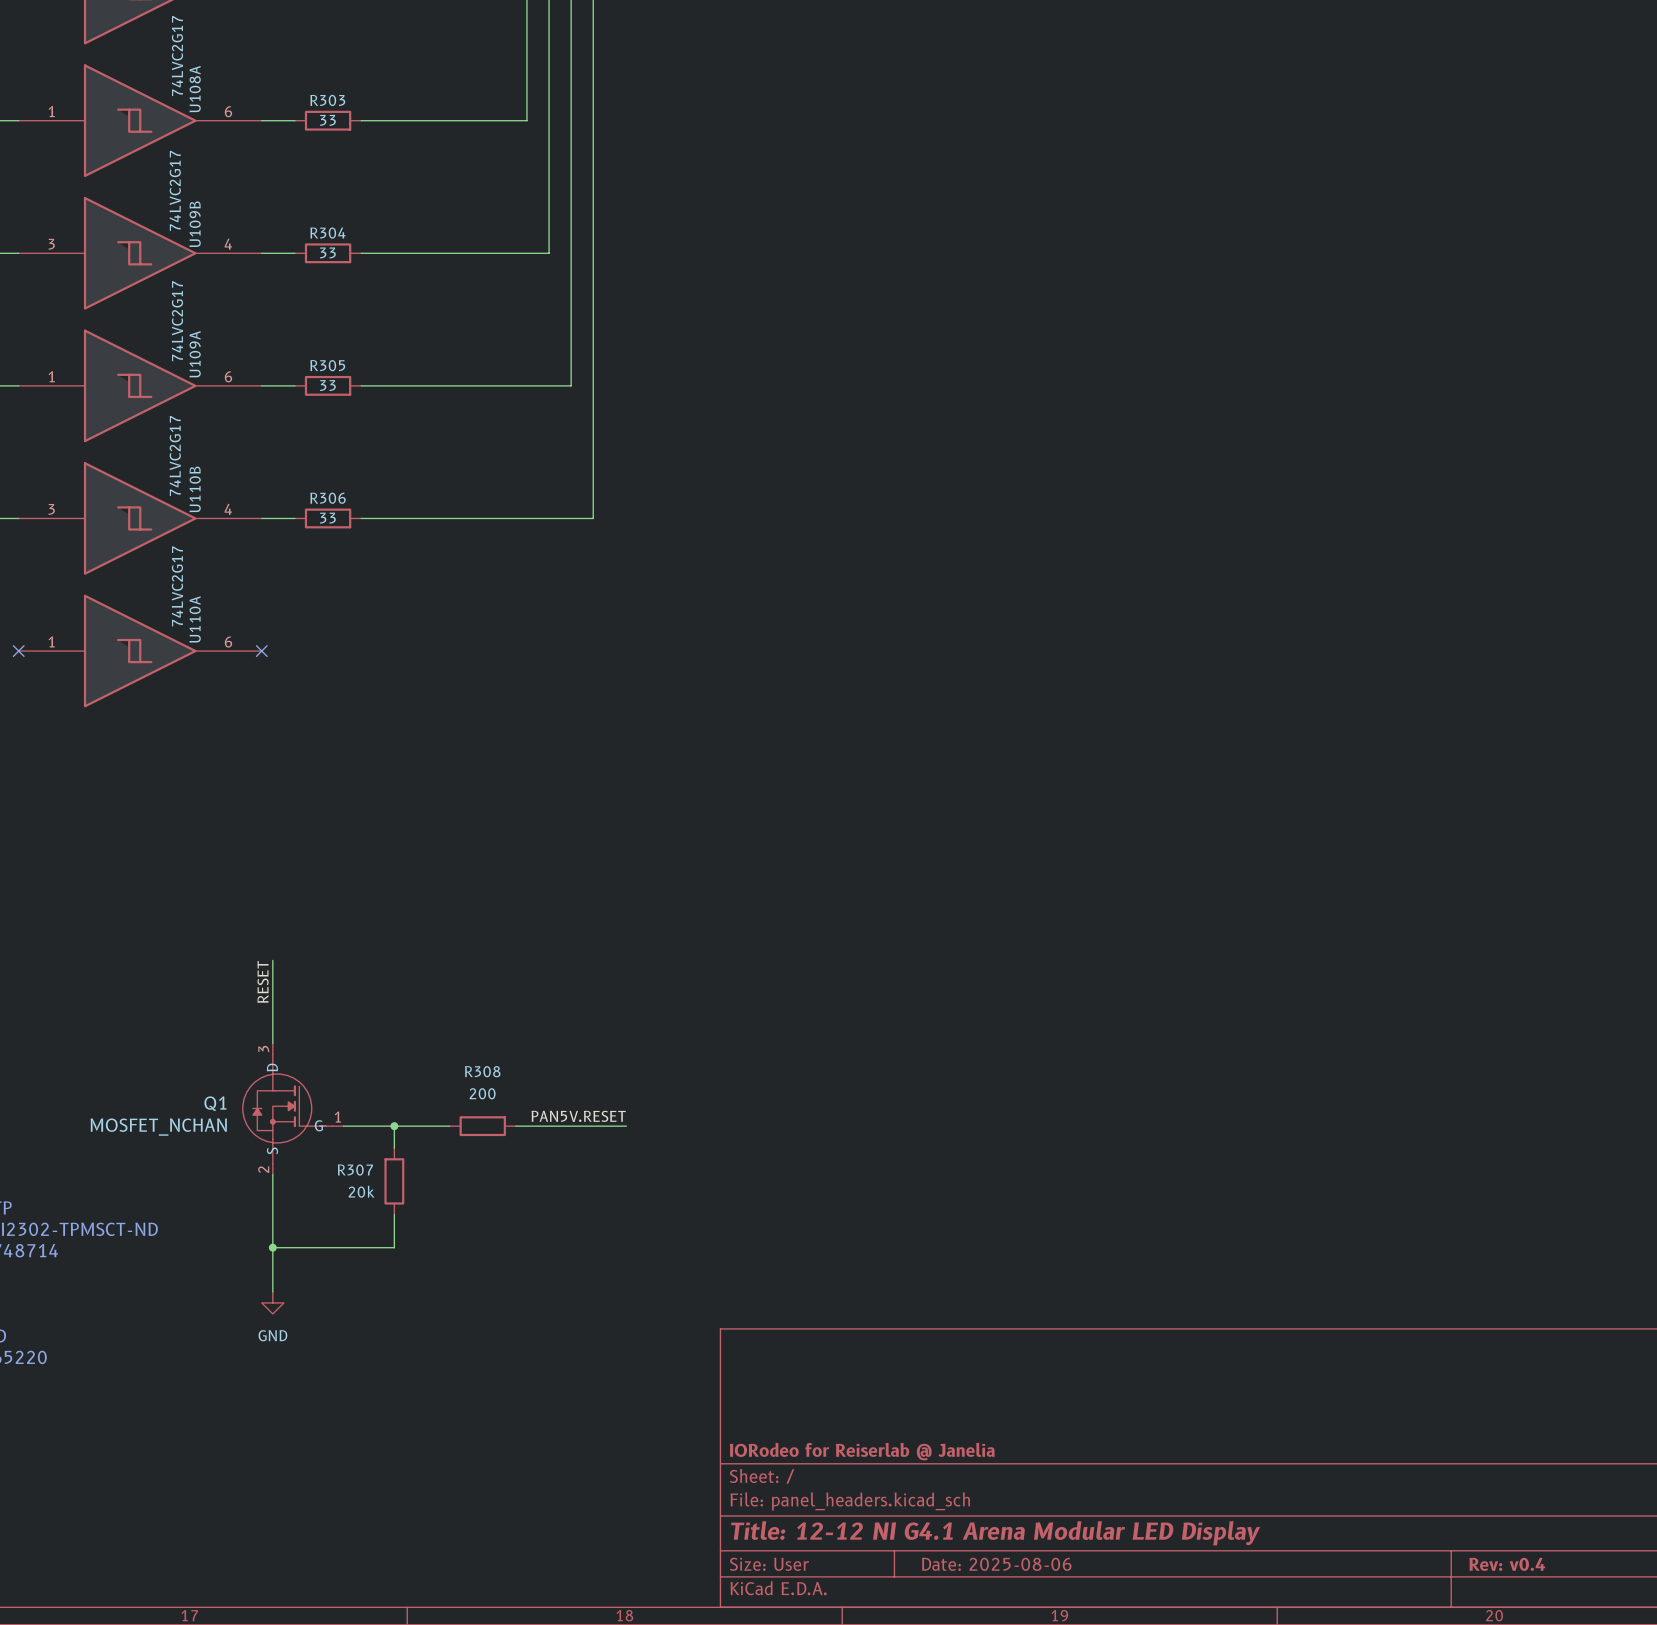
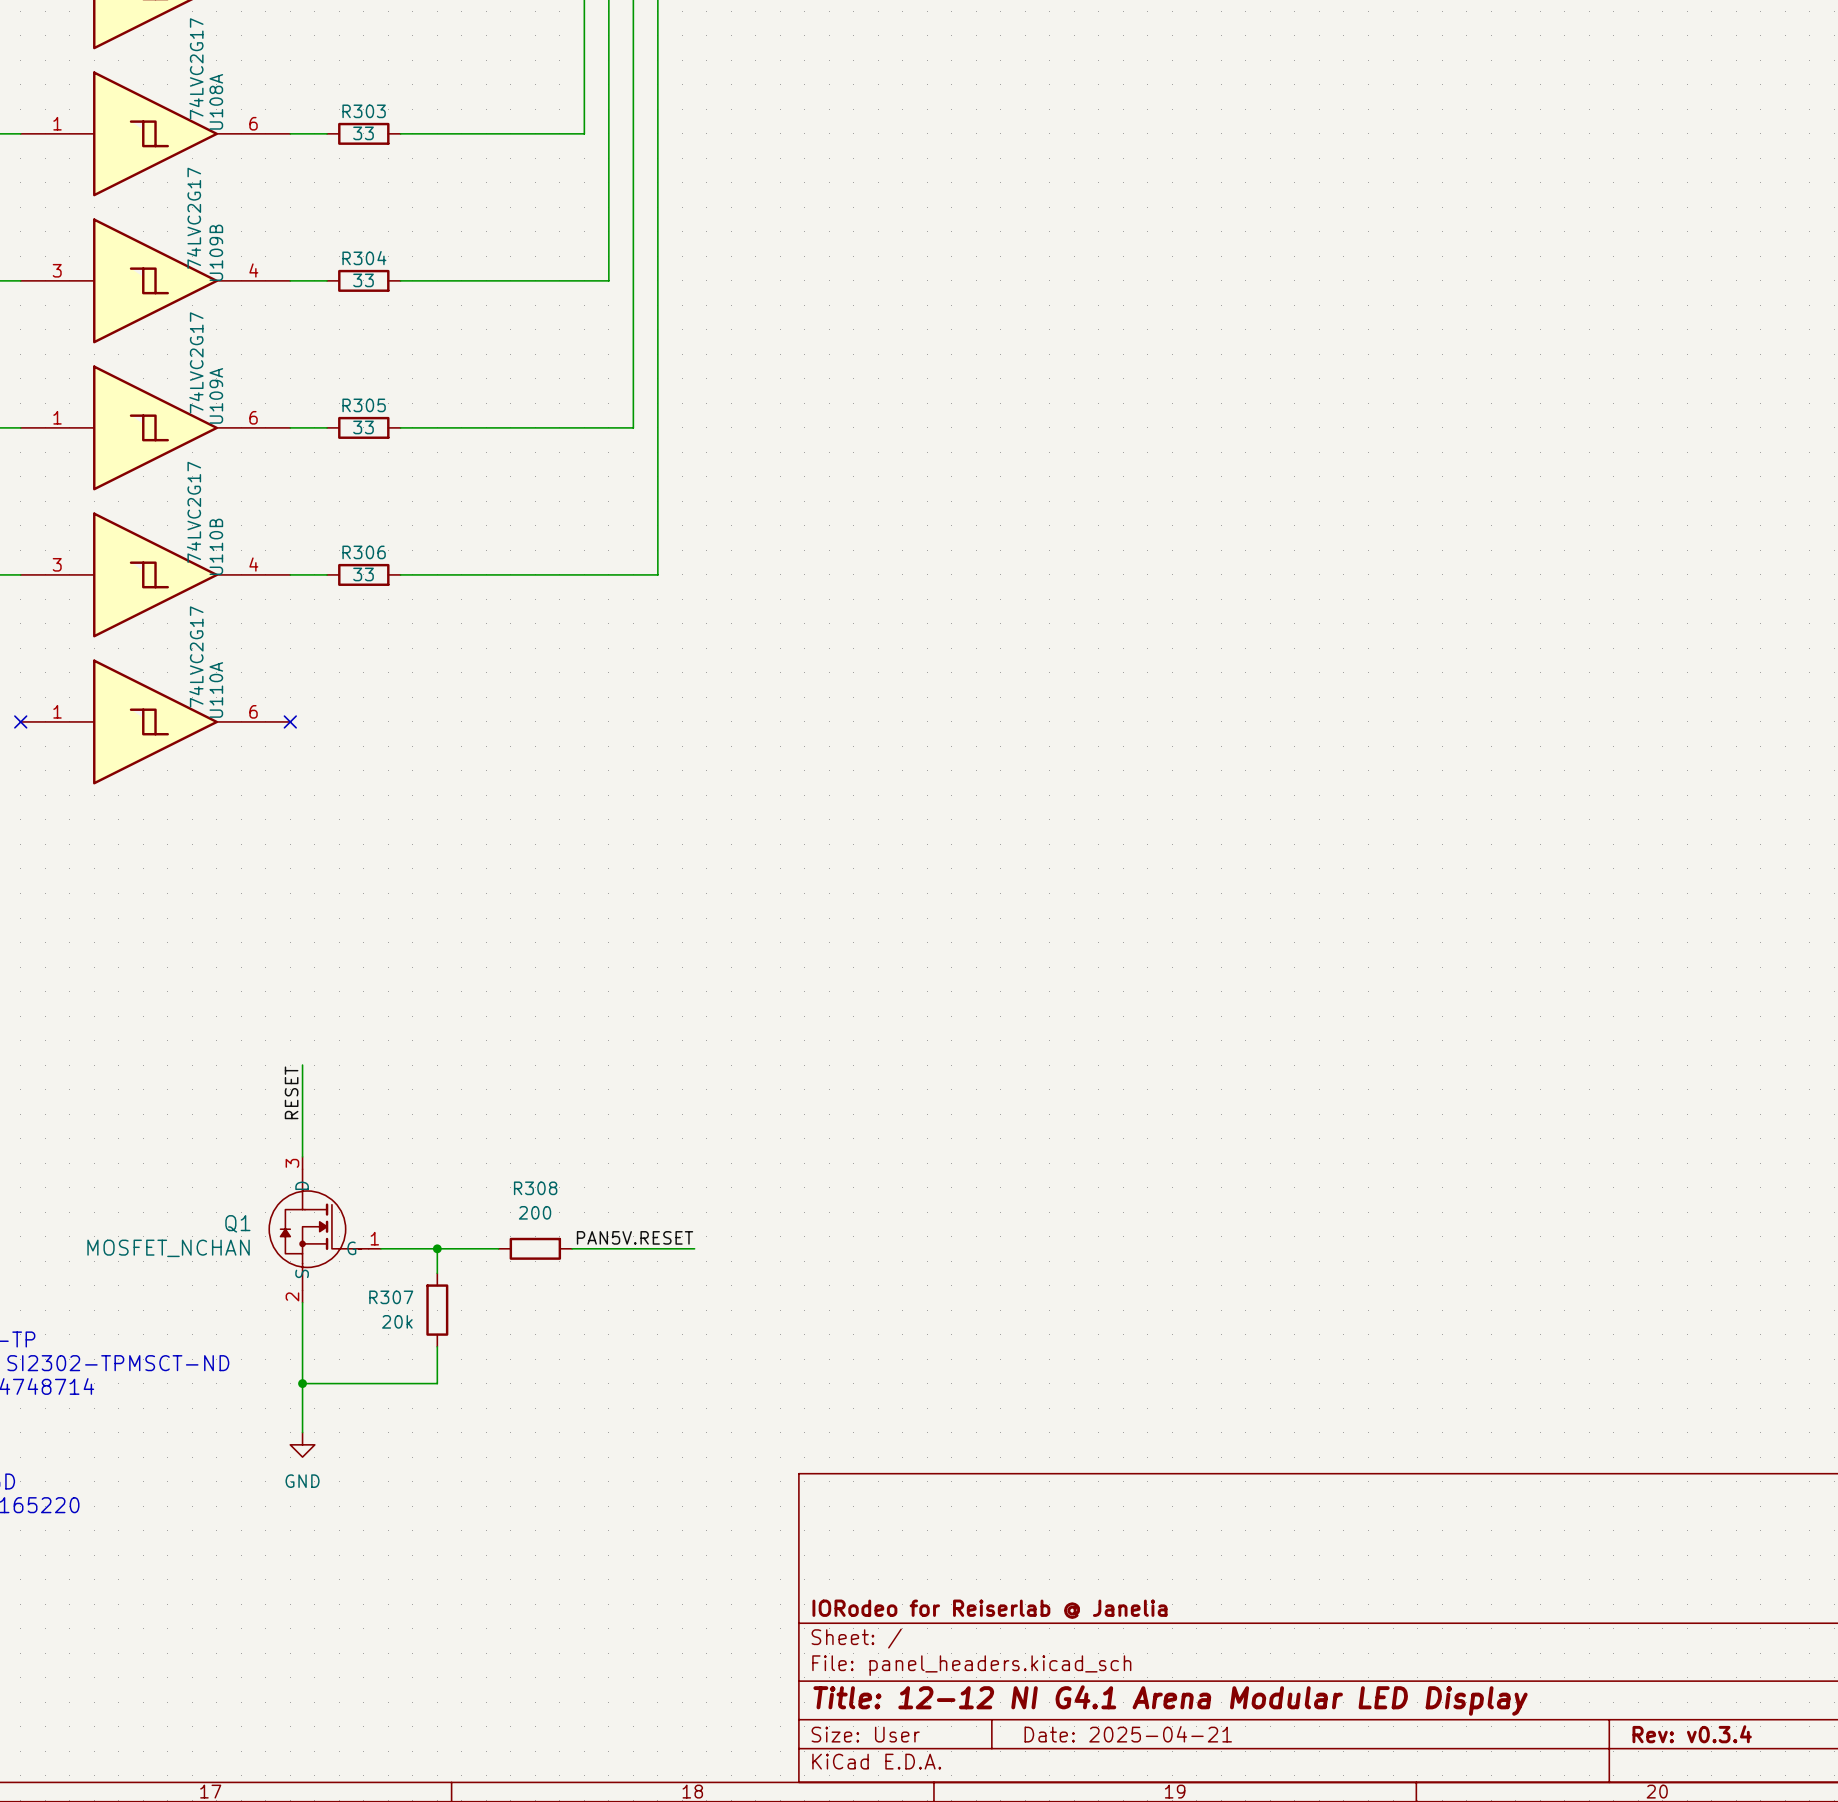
title block: Date: 2025-08-06 (996, 1564) -> Date: 2025-04-21 (1128, 1734)
title block: Rev: v0.4 (1507, 1564) -> Rev: v0.3.4 (1692, 1734)

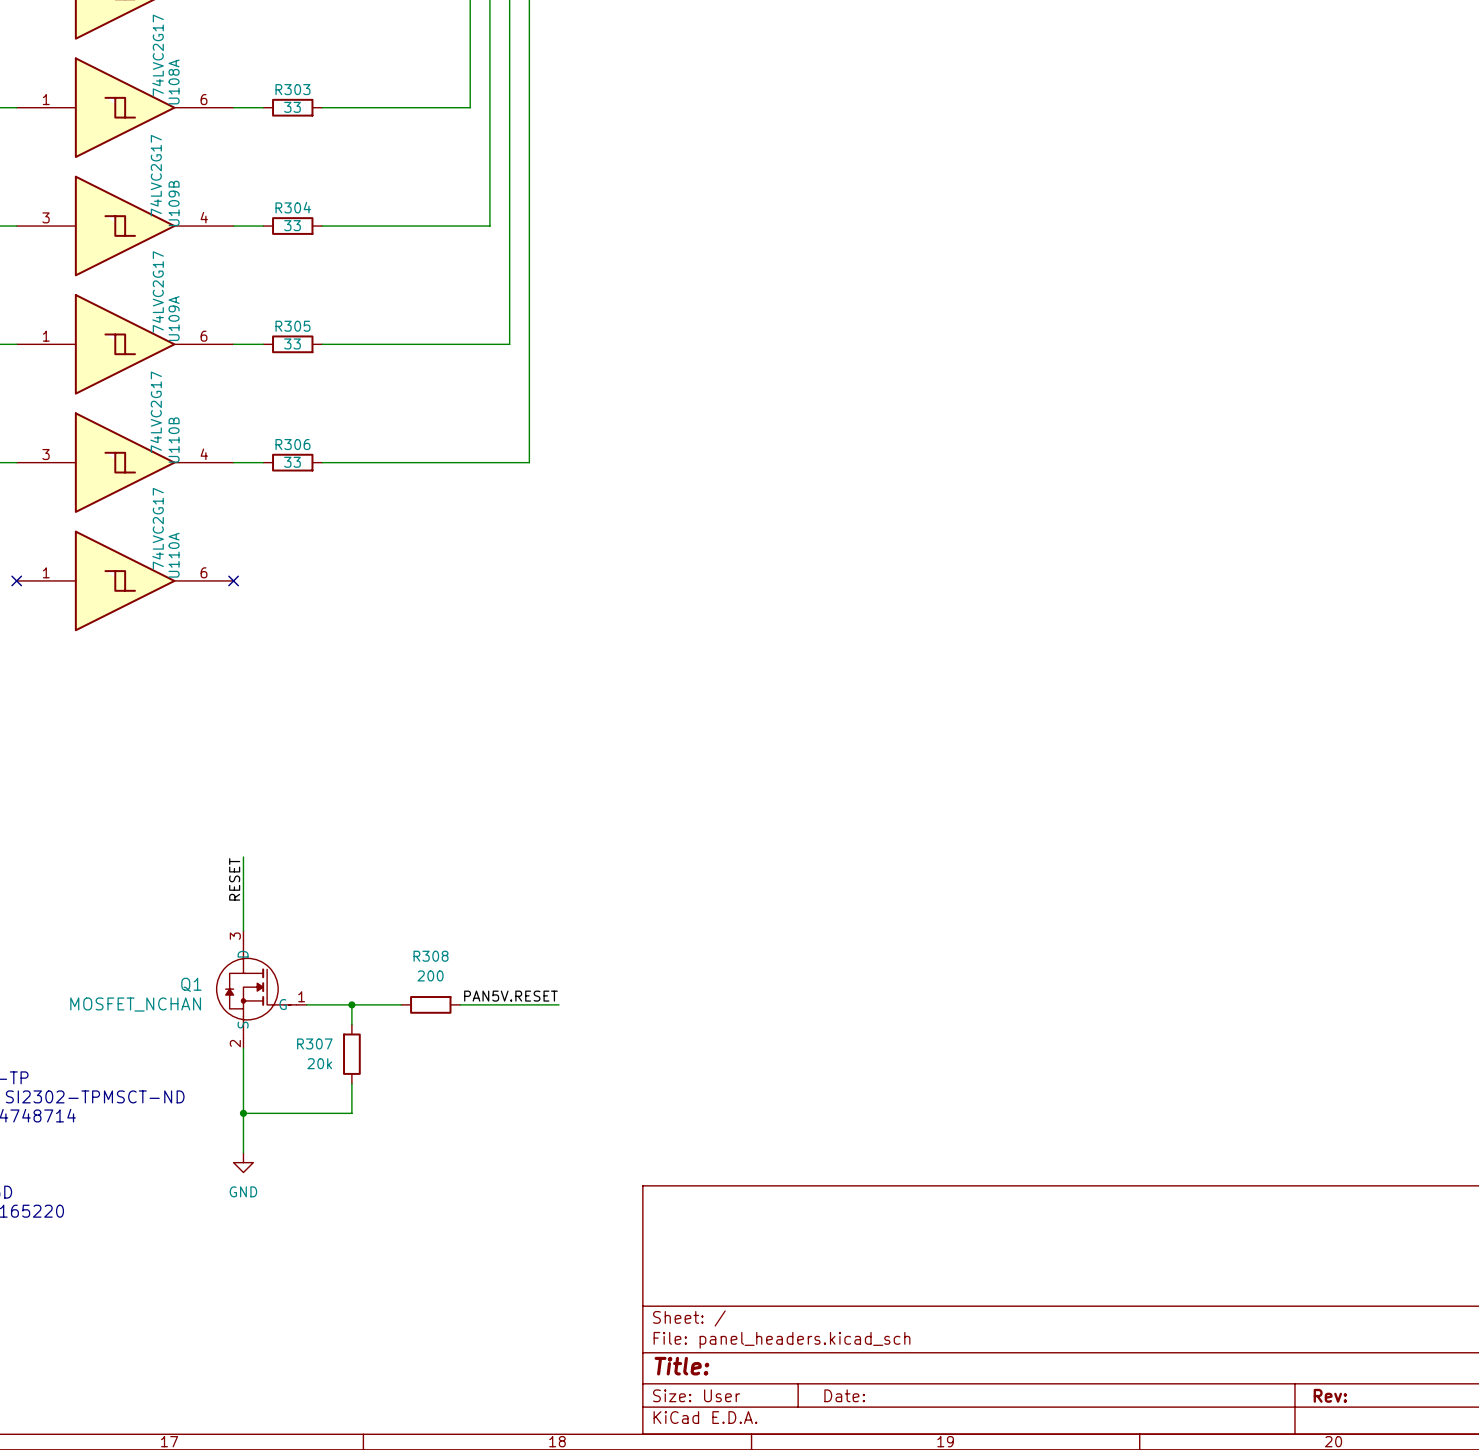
title block: IORodeo for Reiserlab @ Janelia (989, 1609) -> none
title block: Title: 12-12 NI G4.1 Arena Modular LED Display (1170, 1700) -> Title: (681, 1366)
title block: Date: 2025-04-21 (1128, 1734) -> Date: (844, 1395)
title block: Rev: v0.3.4 (1692, 1734) -> Rev: (1330, 1395)

